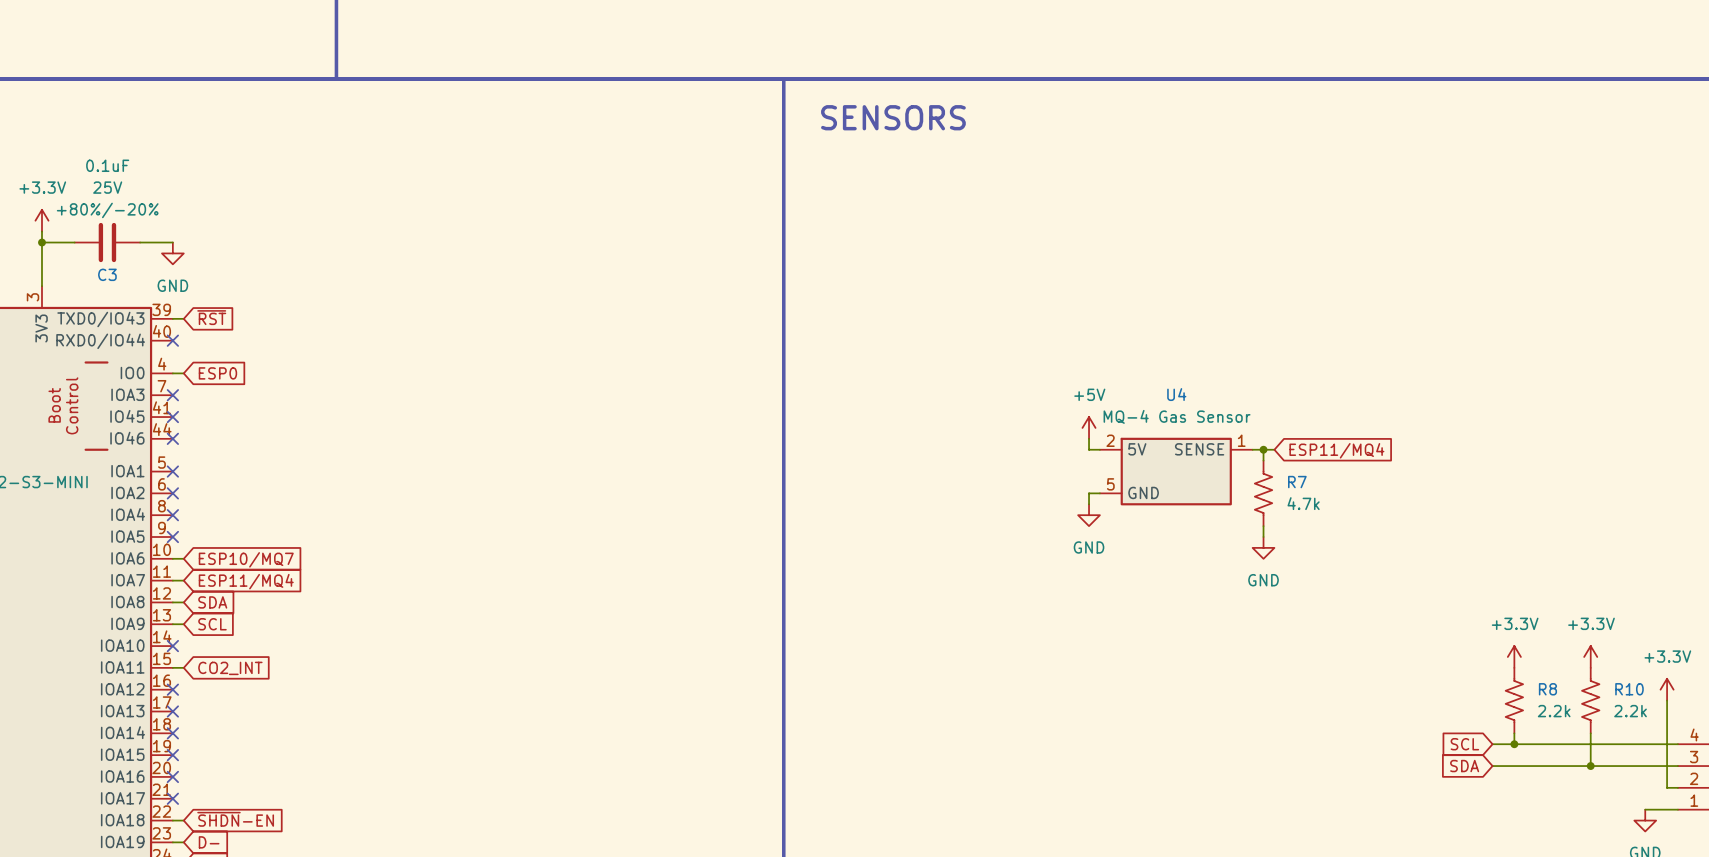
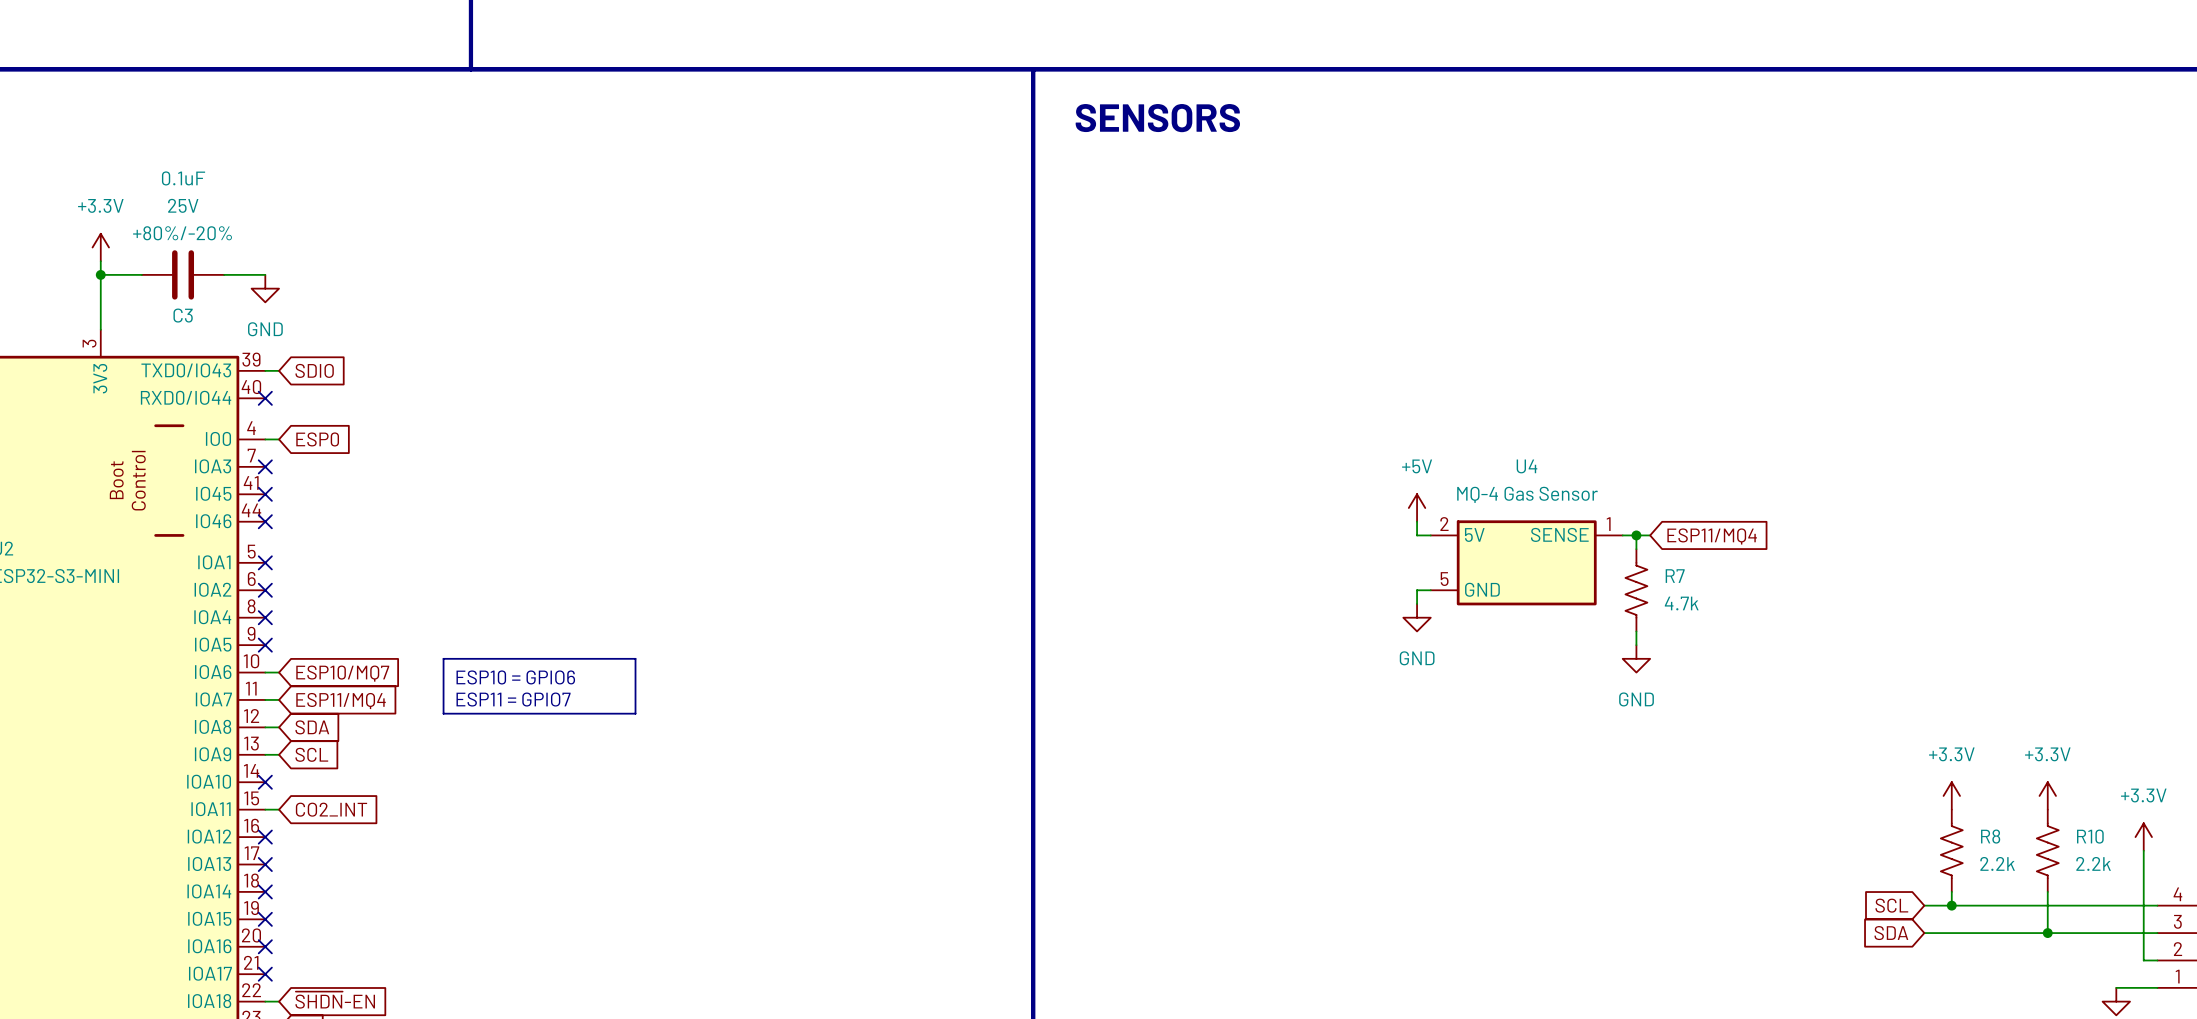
global label: ~{RST} (211, 317) -> SDIO (314, 370)
line: none -> (443, 658) (635, 658) (635, 713) (443, 713) (443, 658)
text: none -> ESP10 = GPIO6 (515, 677)
text: none -> ESP11 = GPIO7 (513, 699)

